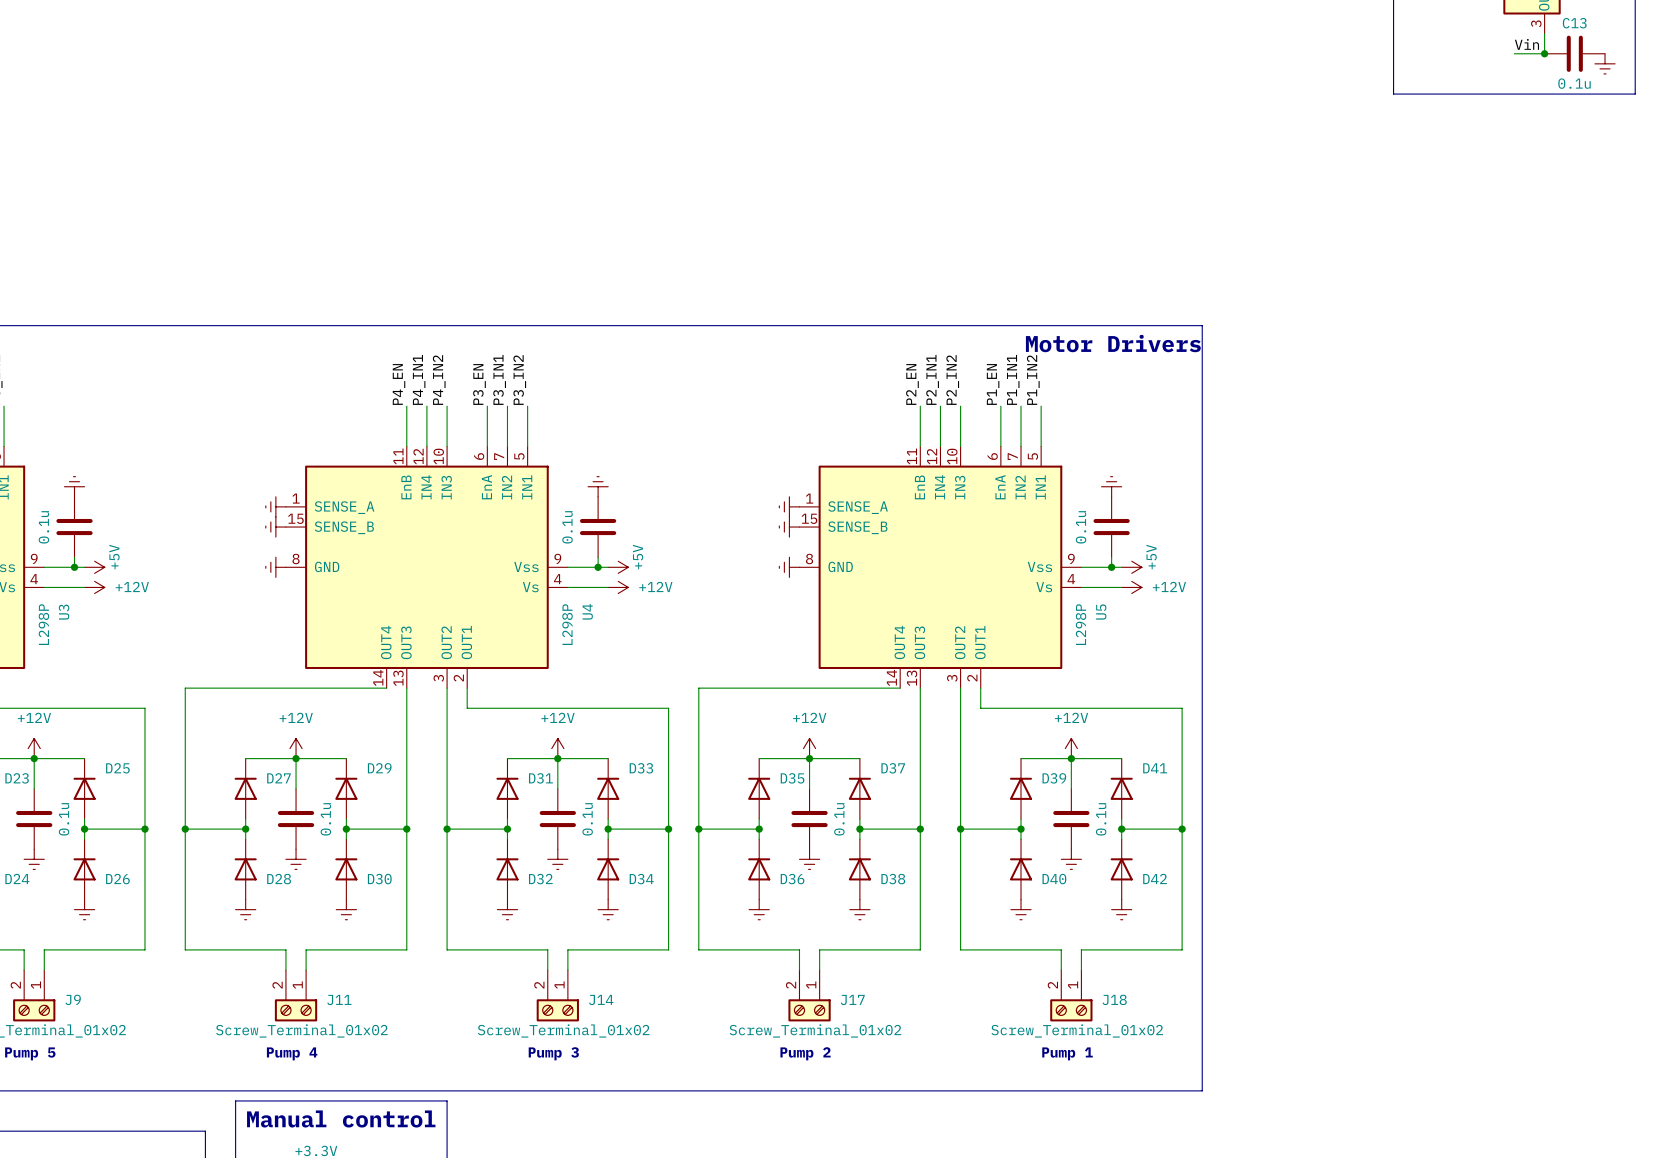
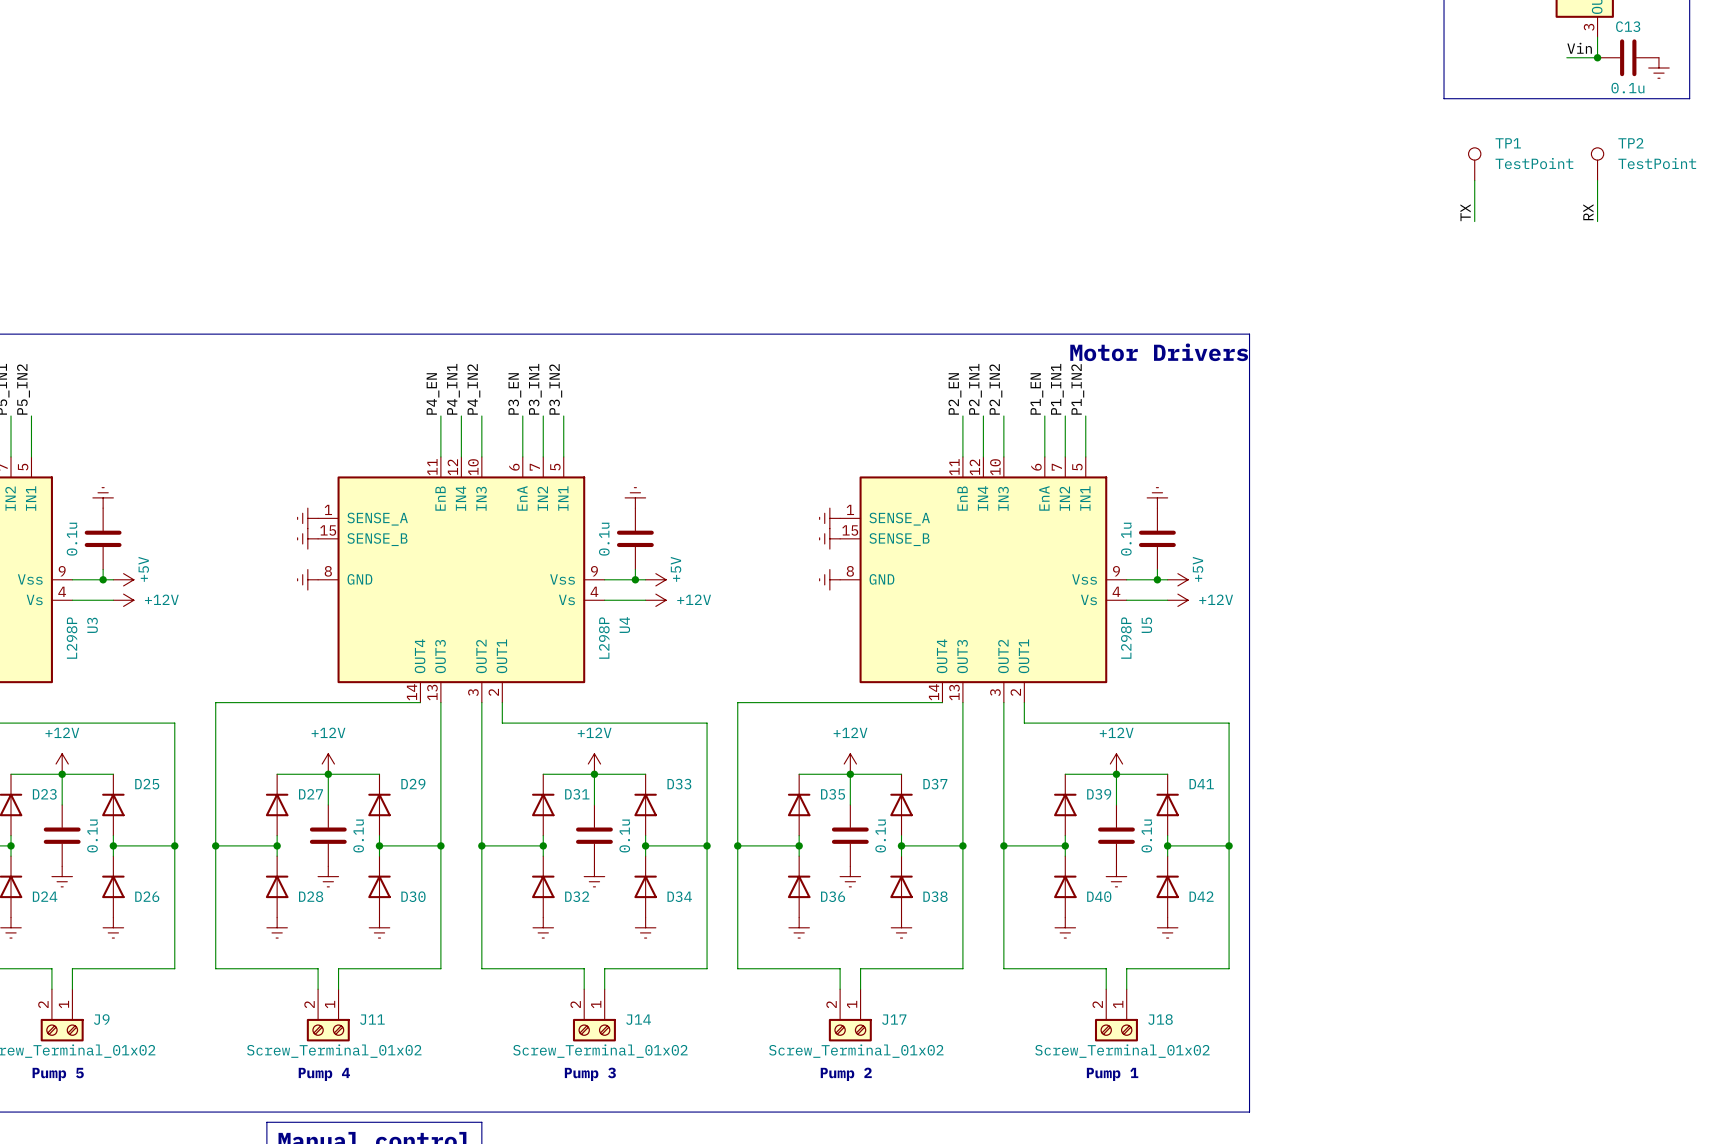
TP1: none -> TestPoint (1474, 164)
TP2: none -> TestPoint (1597, 164)
wire: none -> (1474, 180) (1474, 221)
wire: none -> (1597, 180) (1597, 221)
label: none -> RX (1588, 212)
label: none -> TX (1465, 212)

